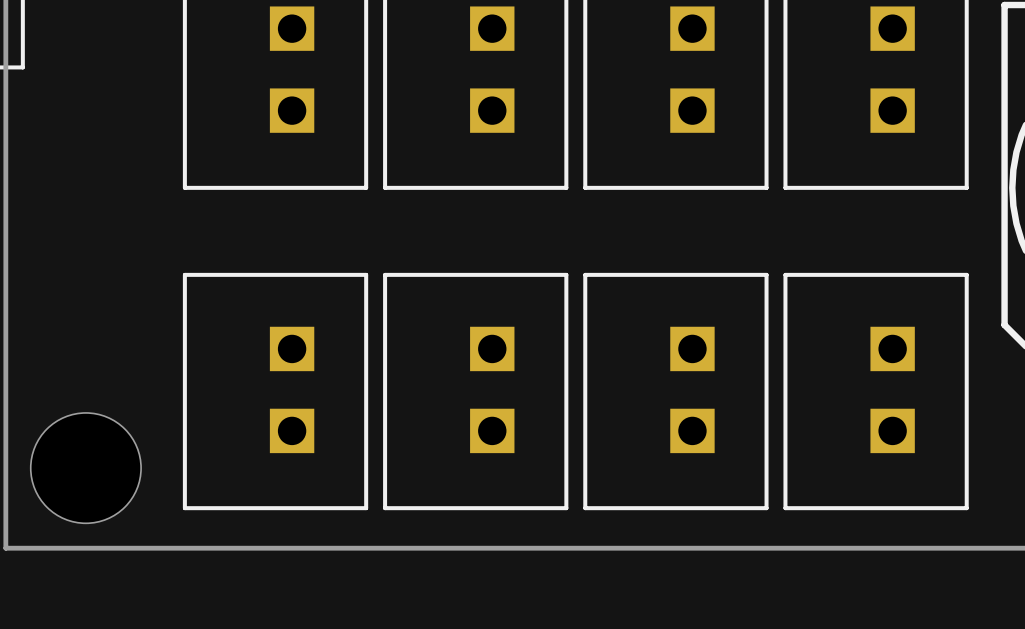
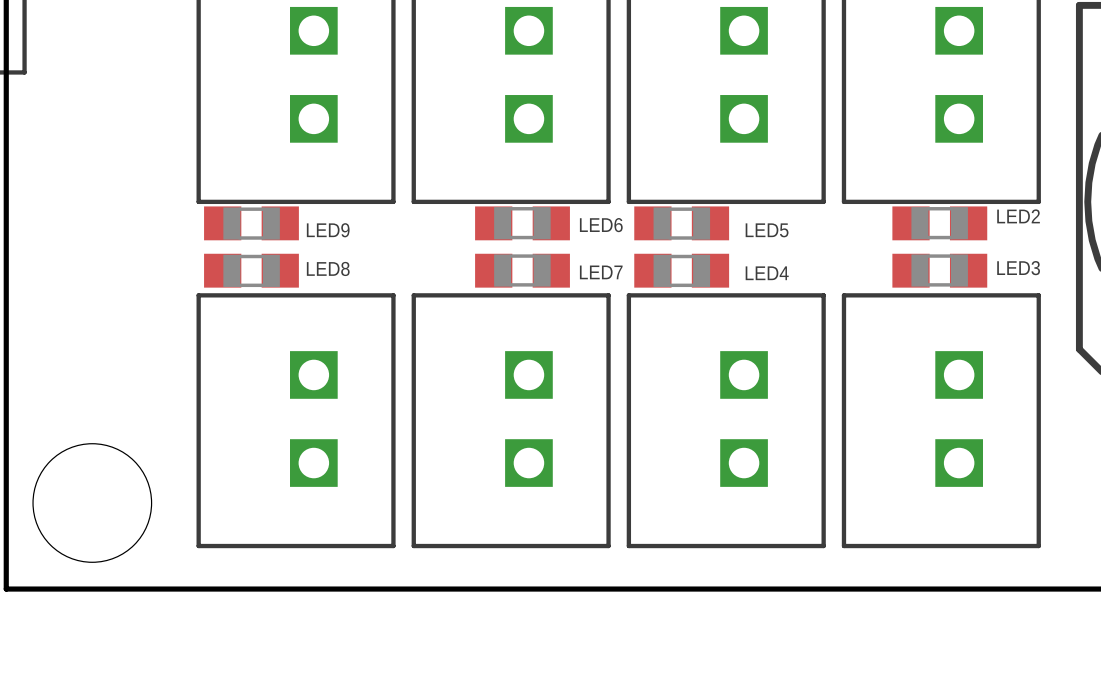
LED9: none -> (251, 223)
LED6: none -> (522, 223)
LED5: none -> (681, 223)
LED2: none -> (939, 223)
LED8: none -> (251, 270)
LED7: none -> (522, 270)
LED4: none -> (681, 270)
LED3: none -> (939, 270)

